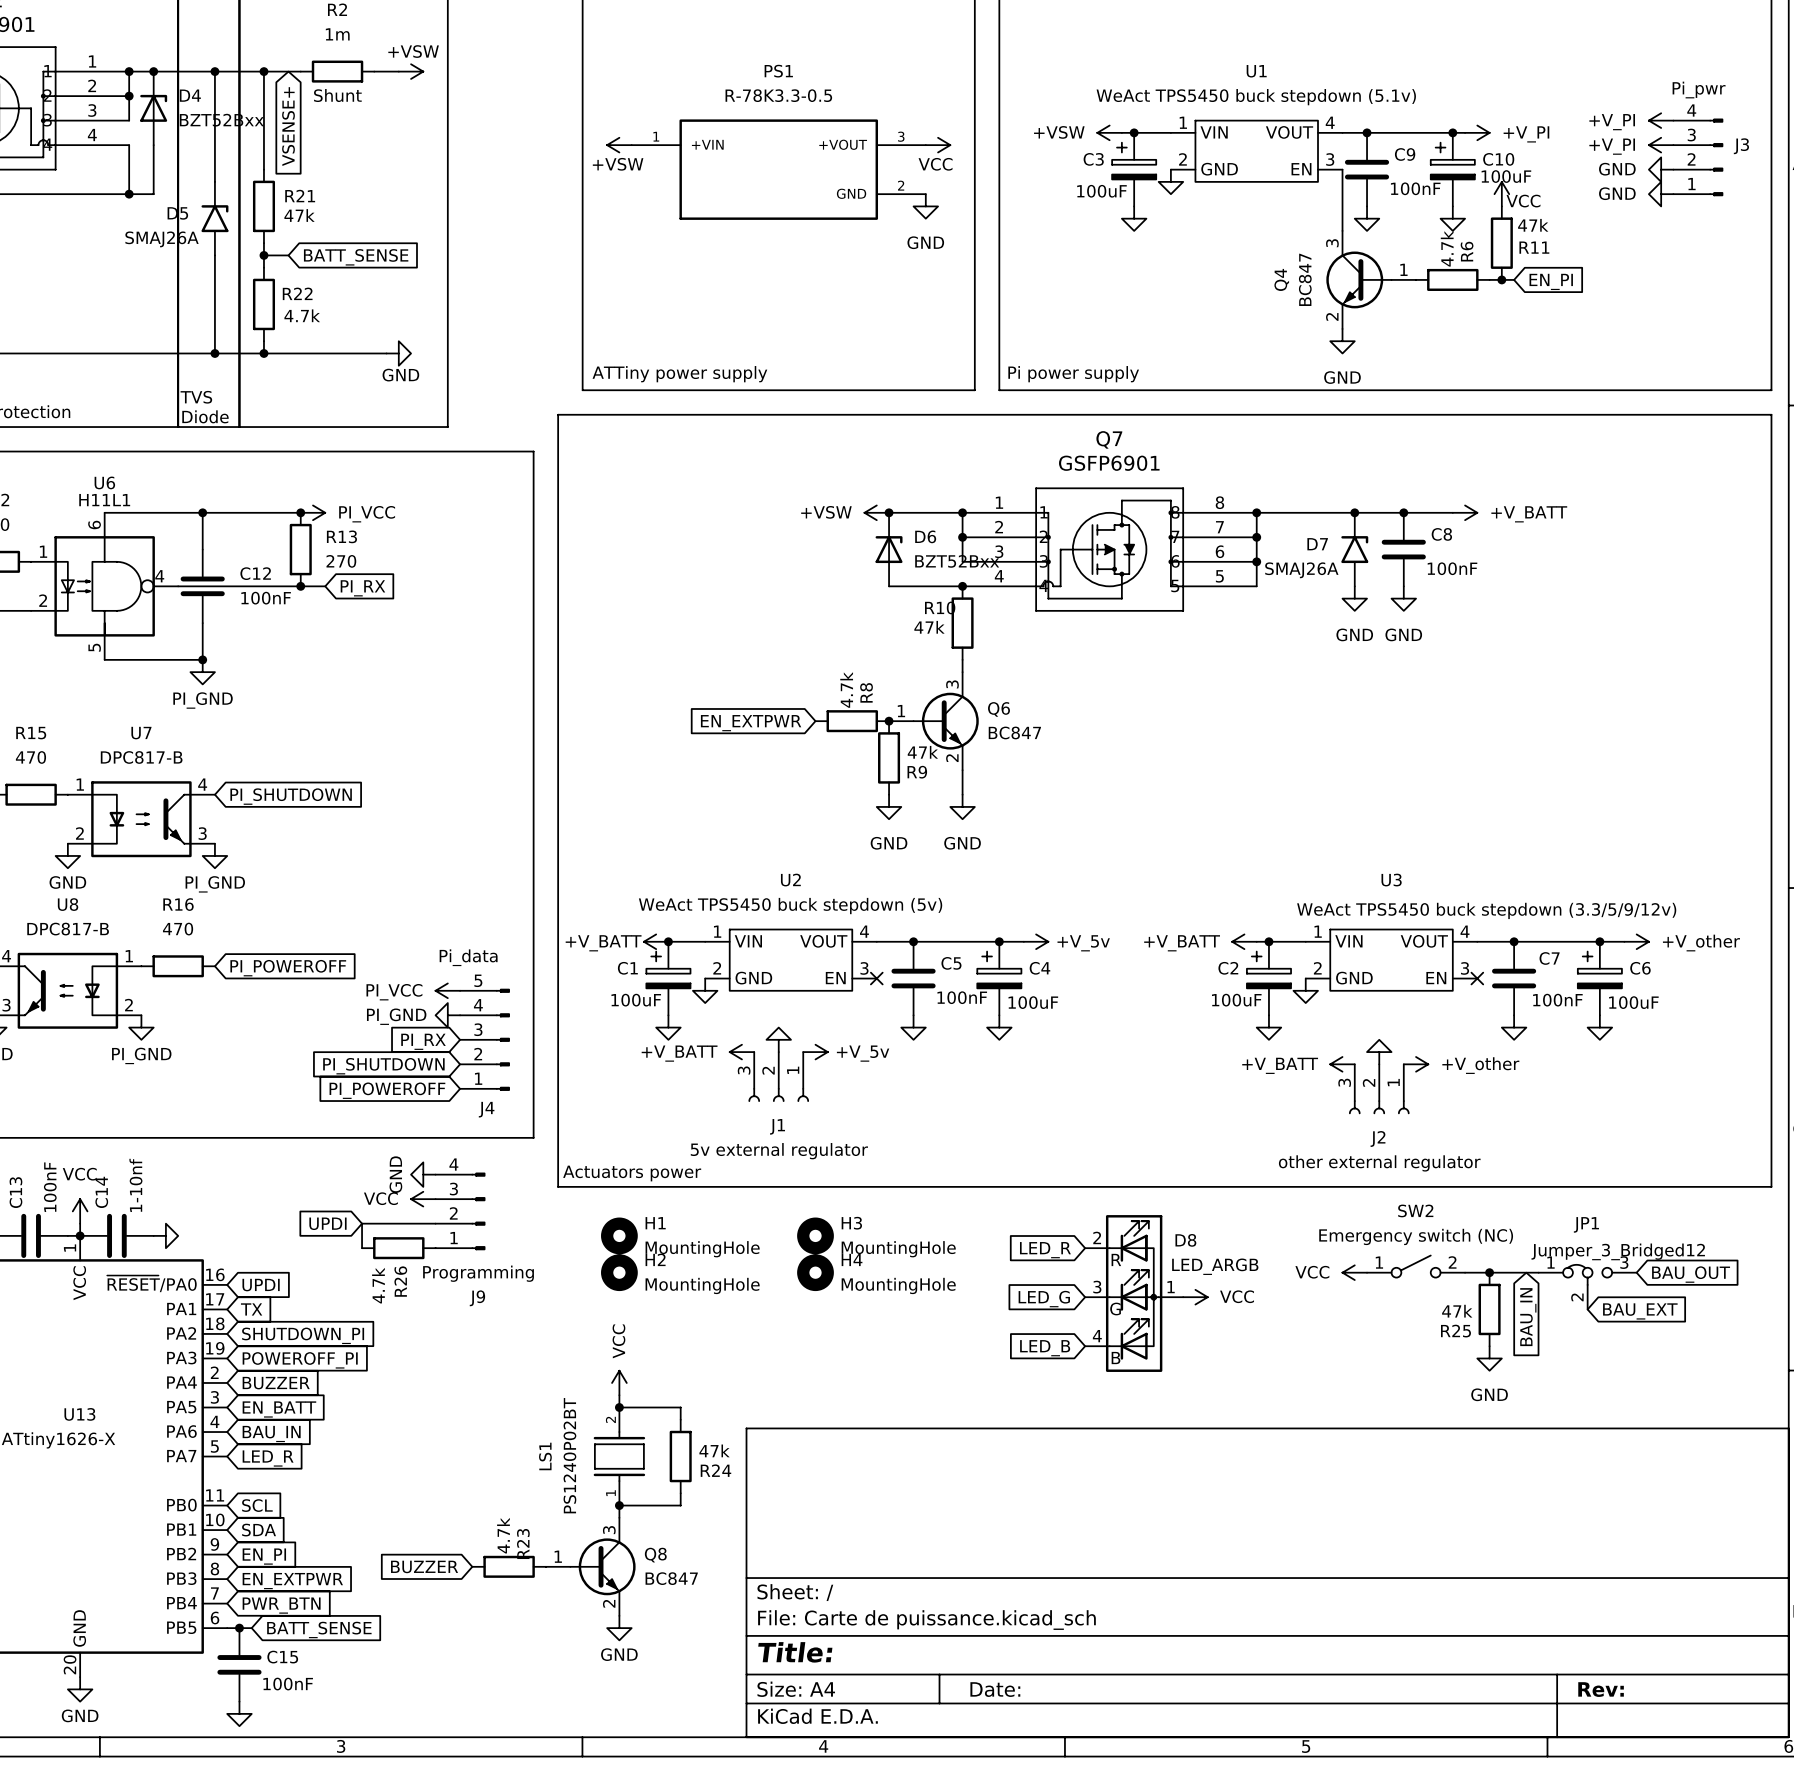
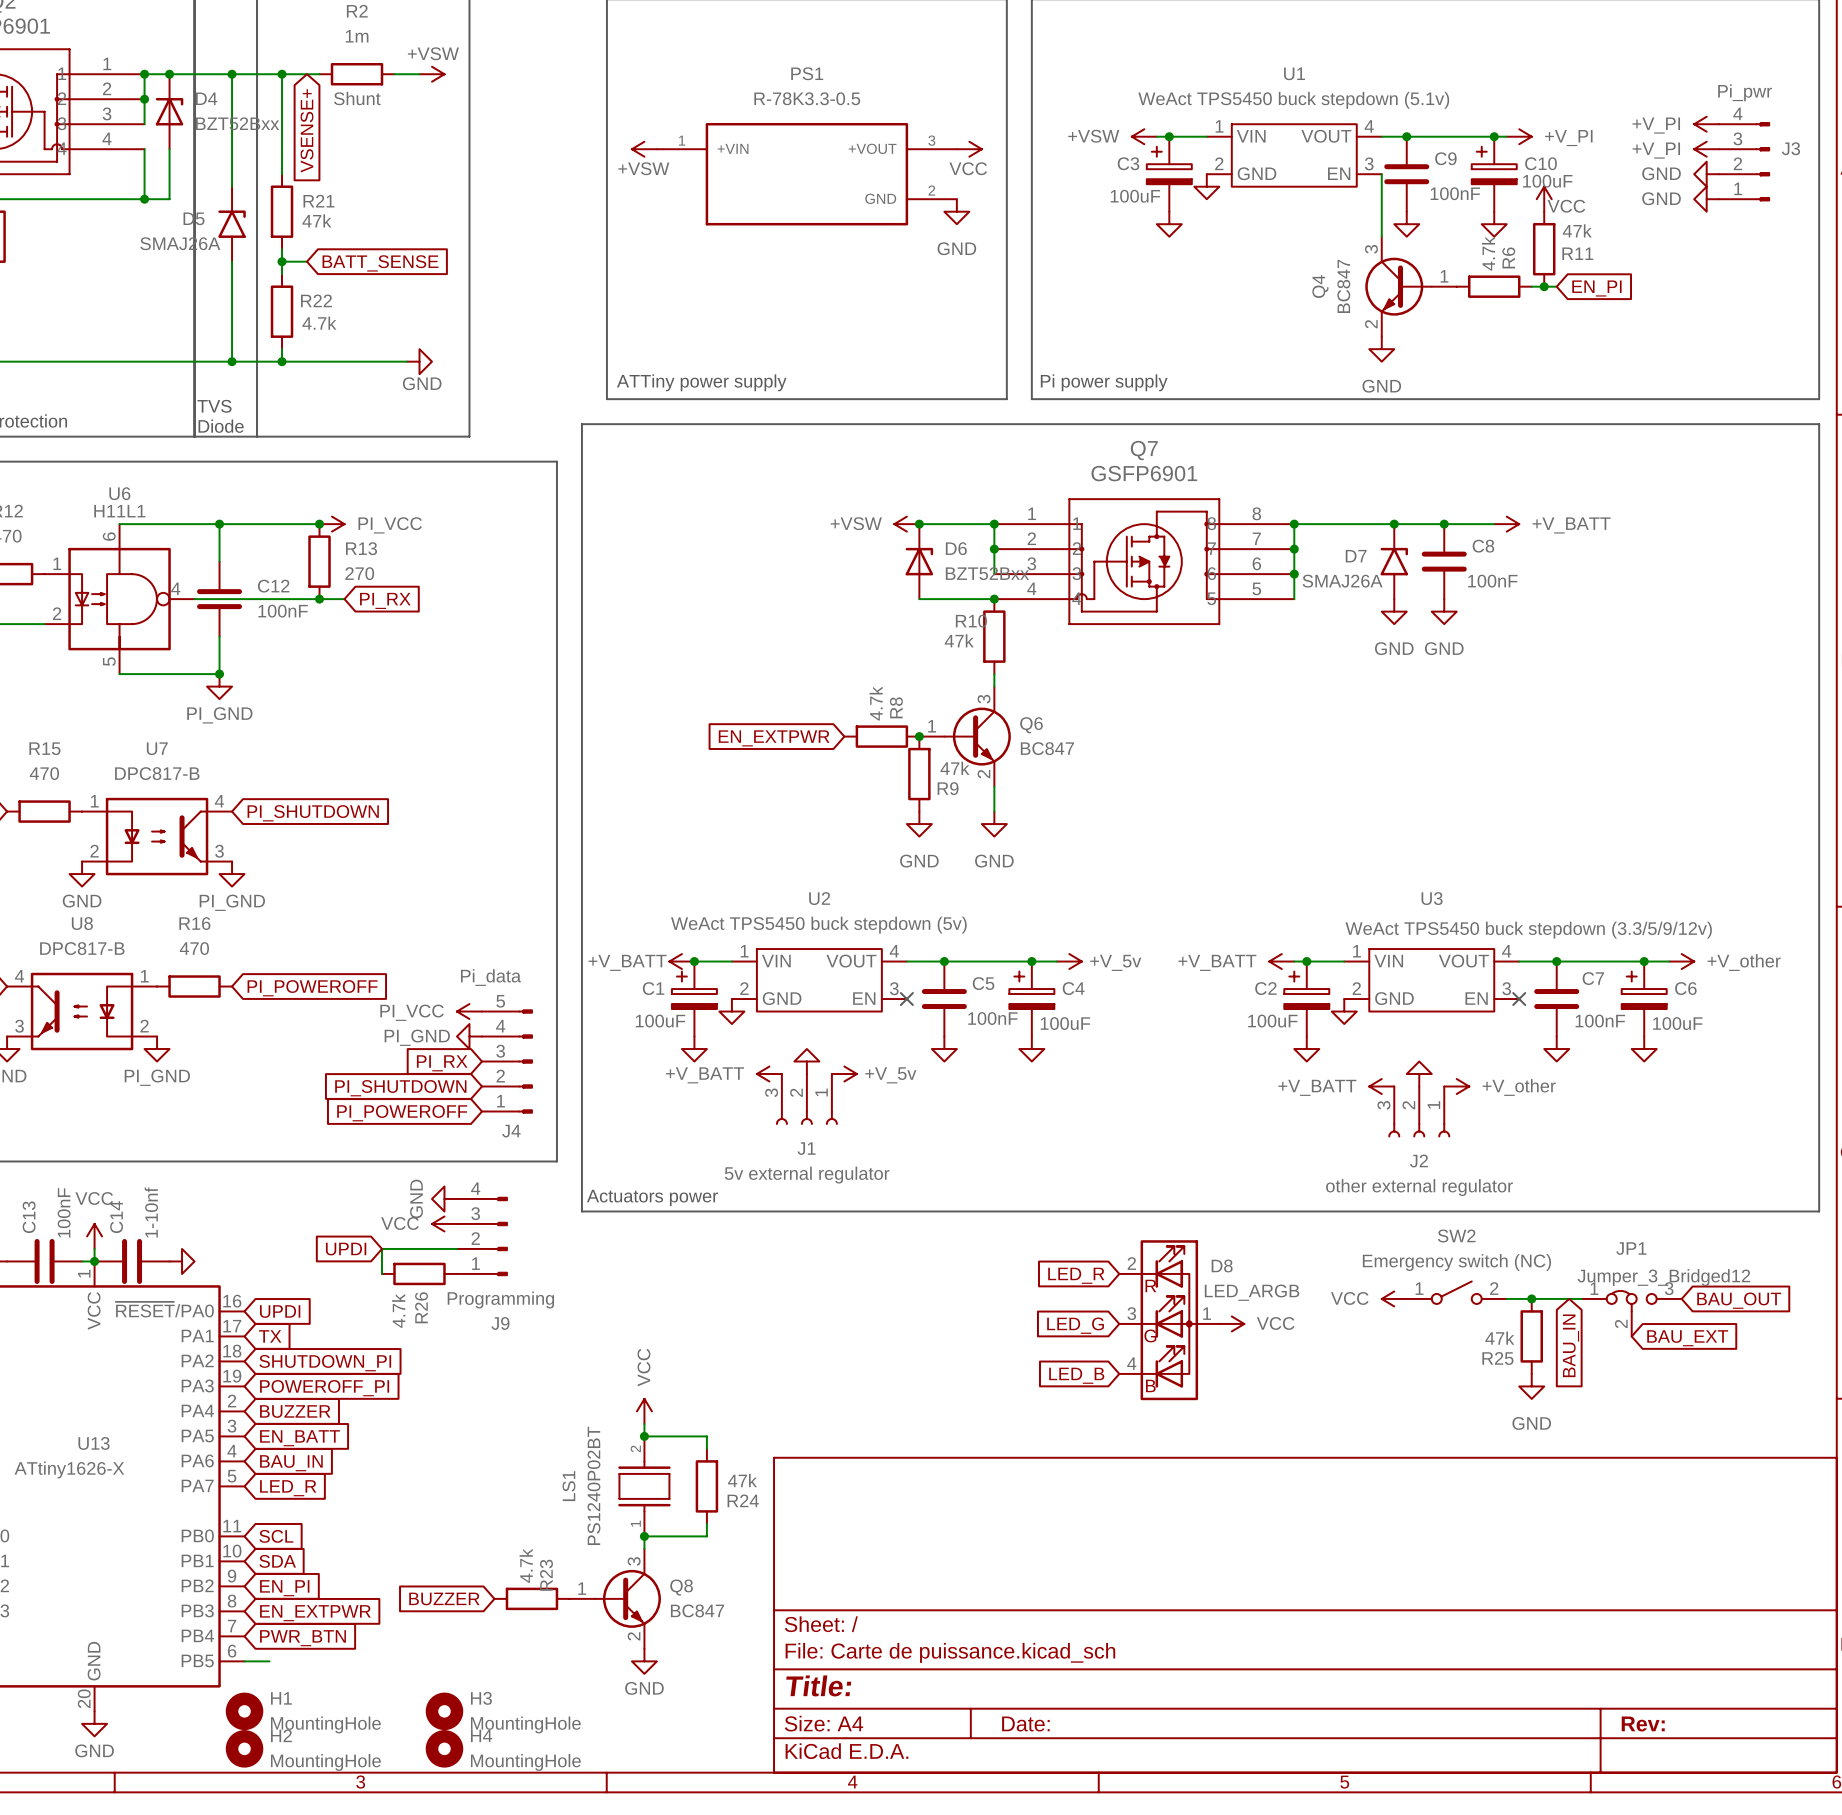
H1 position: (619, 1235) -> (244, 1711)
H3 position: (815, 1235) -> (444, 1711)
H2 position: (619, 1272) -> (244, 1748)
H4 position: (815, 1272) -> (444, 1748)
junction: (239, 1628) -> none
global label: BATT_SENSE (319, 1629) -> none
C15: 100nF (239, 1664) -> none
power symbol: (239, 1713) -> none

